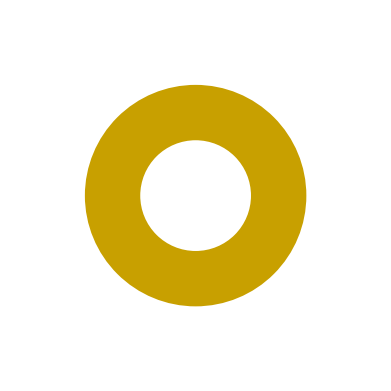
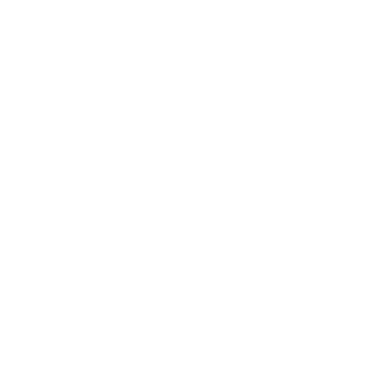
part: (195, 195) -> none

